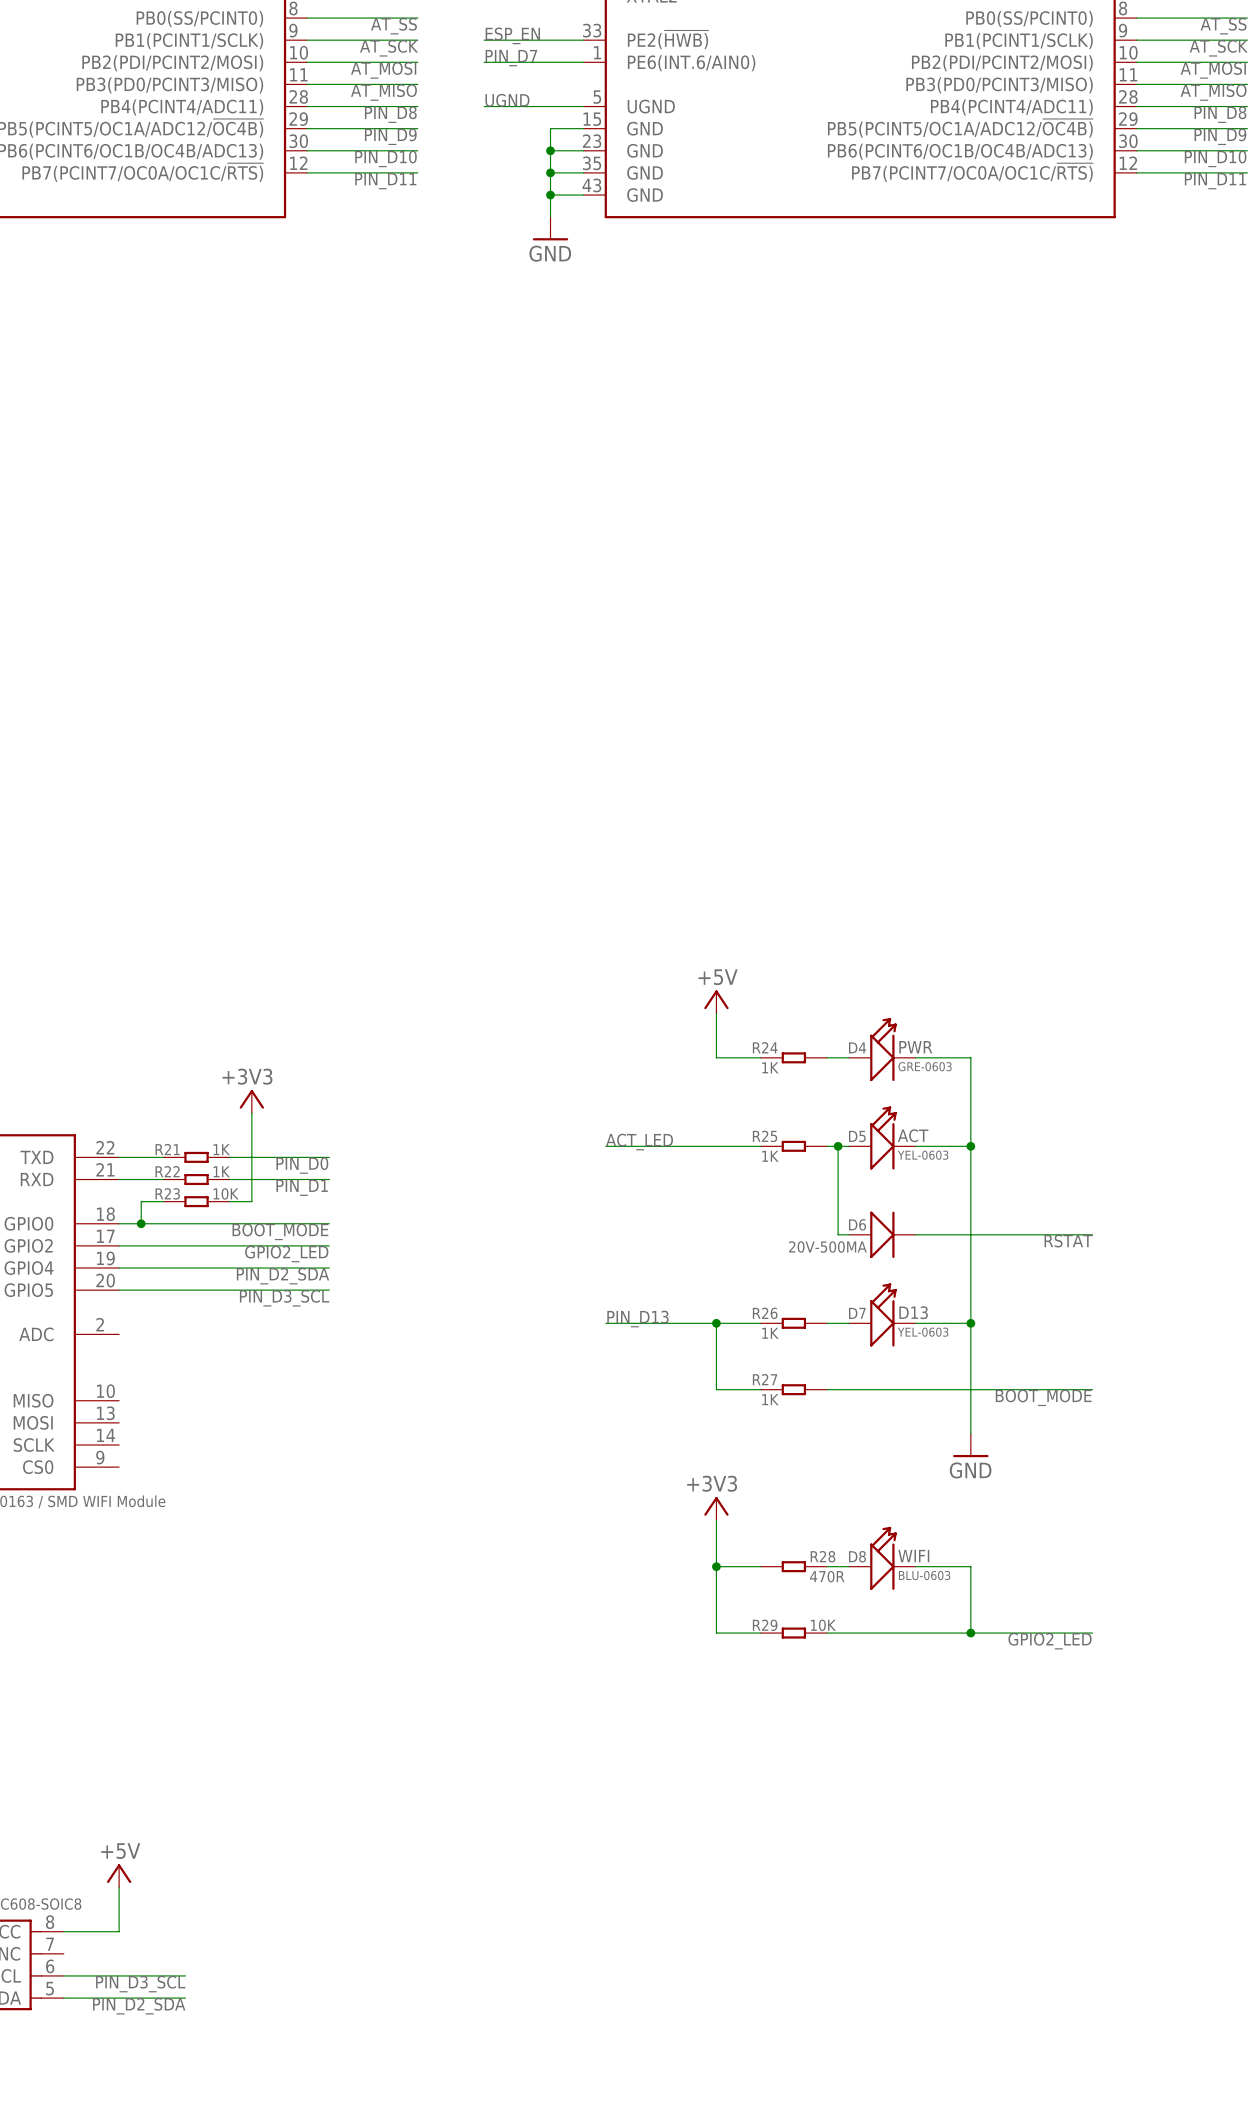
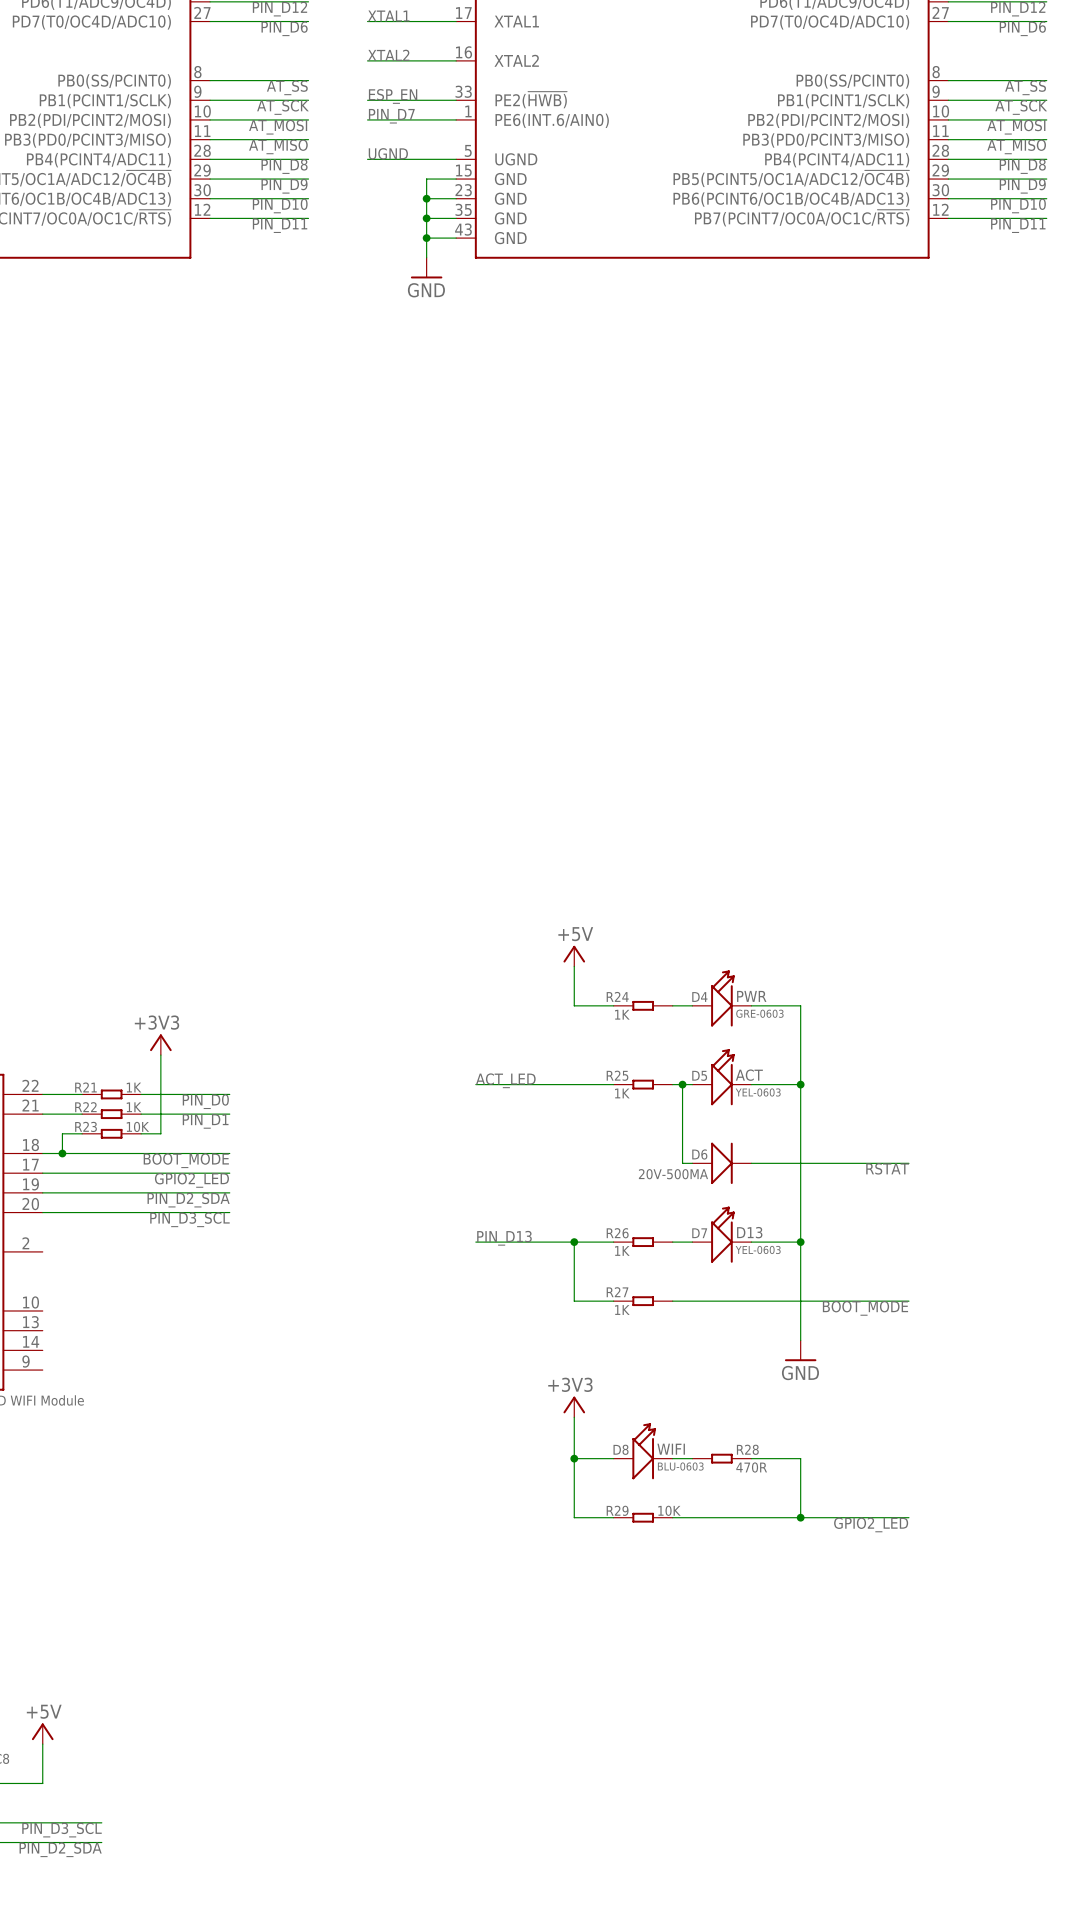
D8 position: (882, 1558) -> (643, 1451)
R28 position: (793, 1566) -> (721, 1458)

